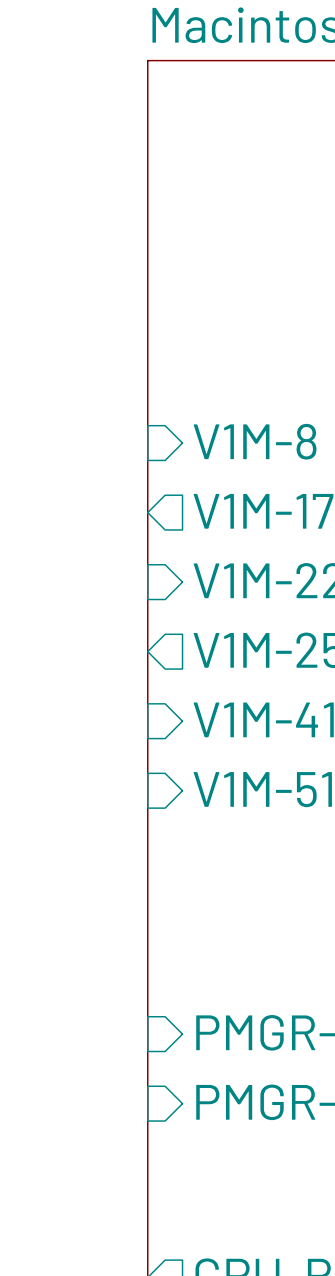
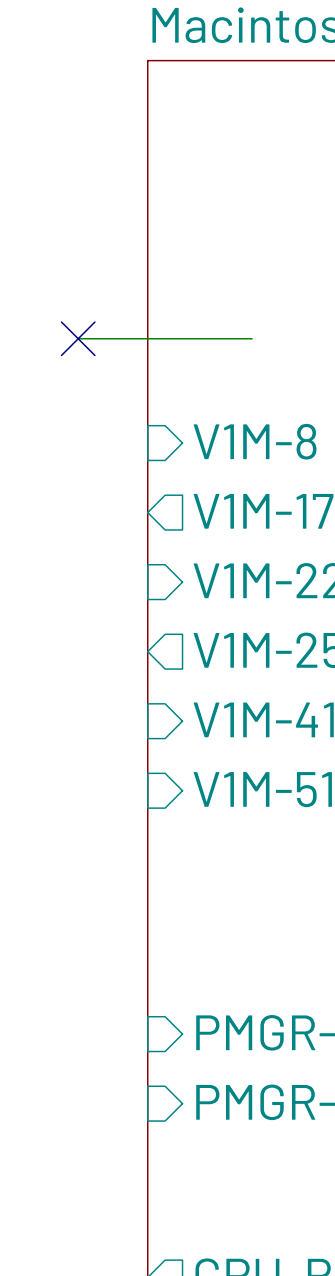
wire: none -> (78, 338) (252, 338)
no-connect mark: none -> (78, 338)

